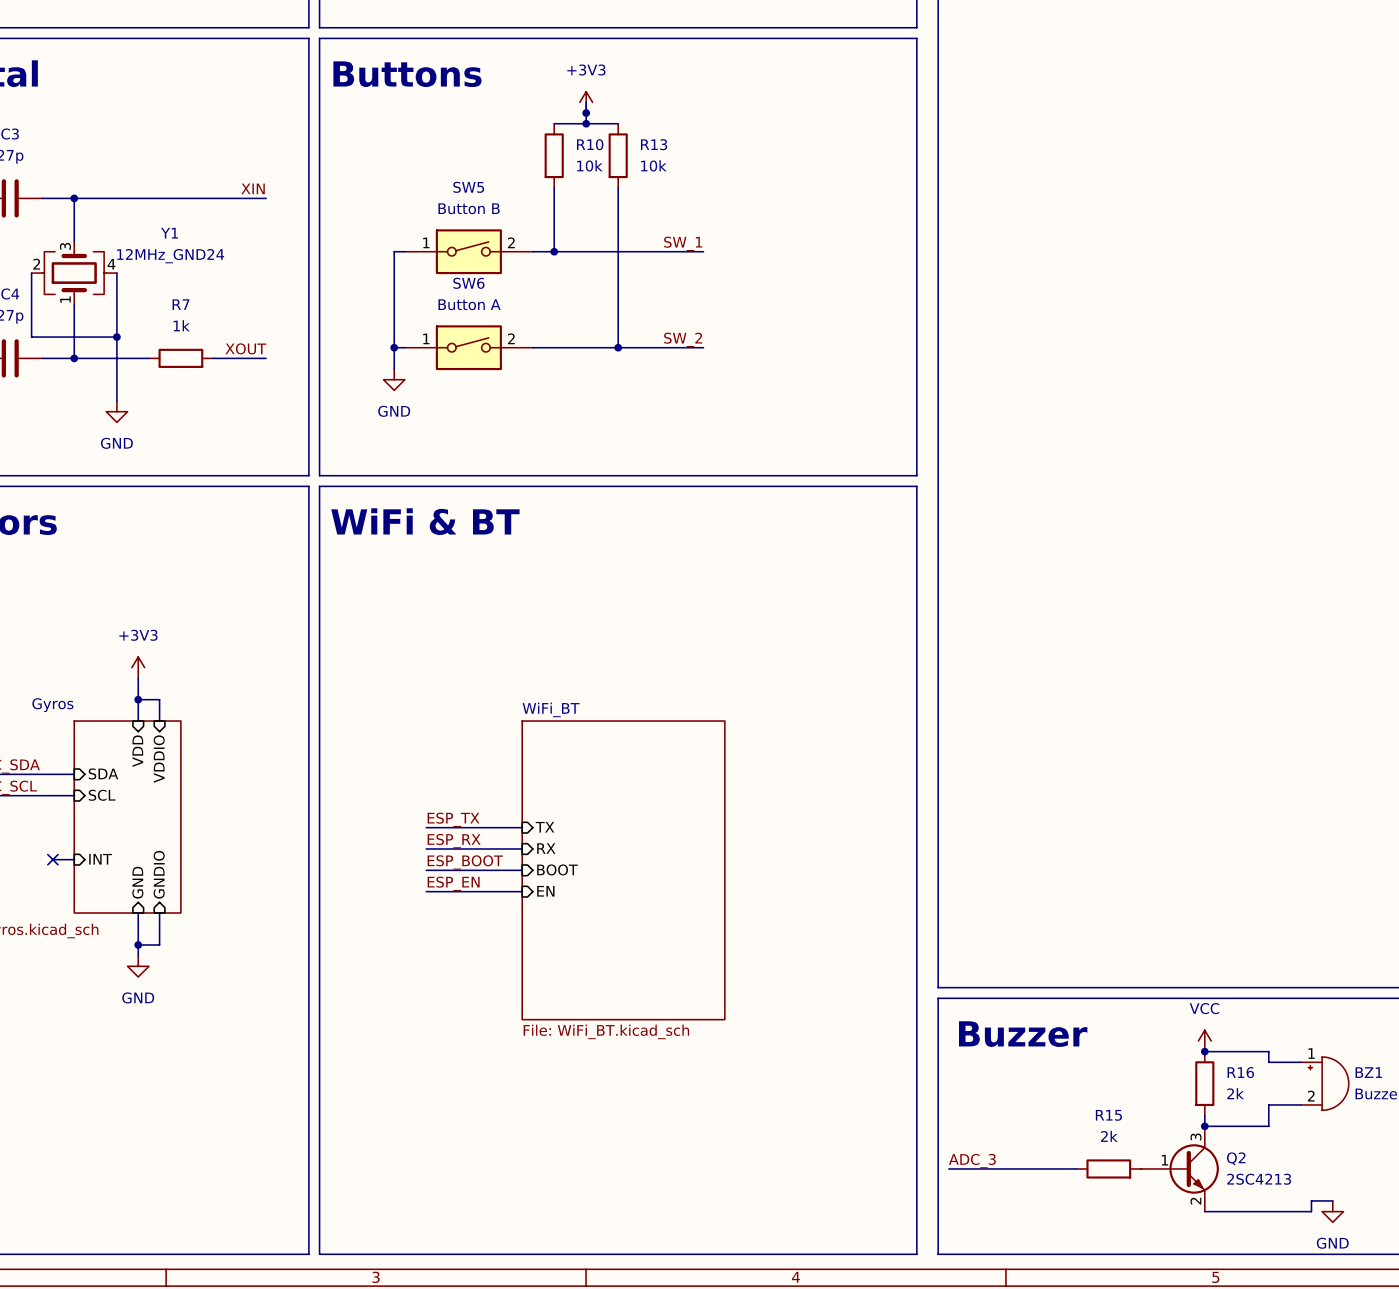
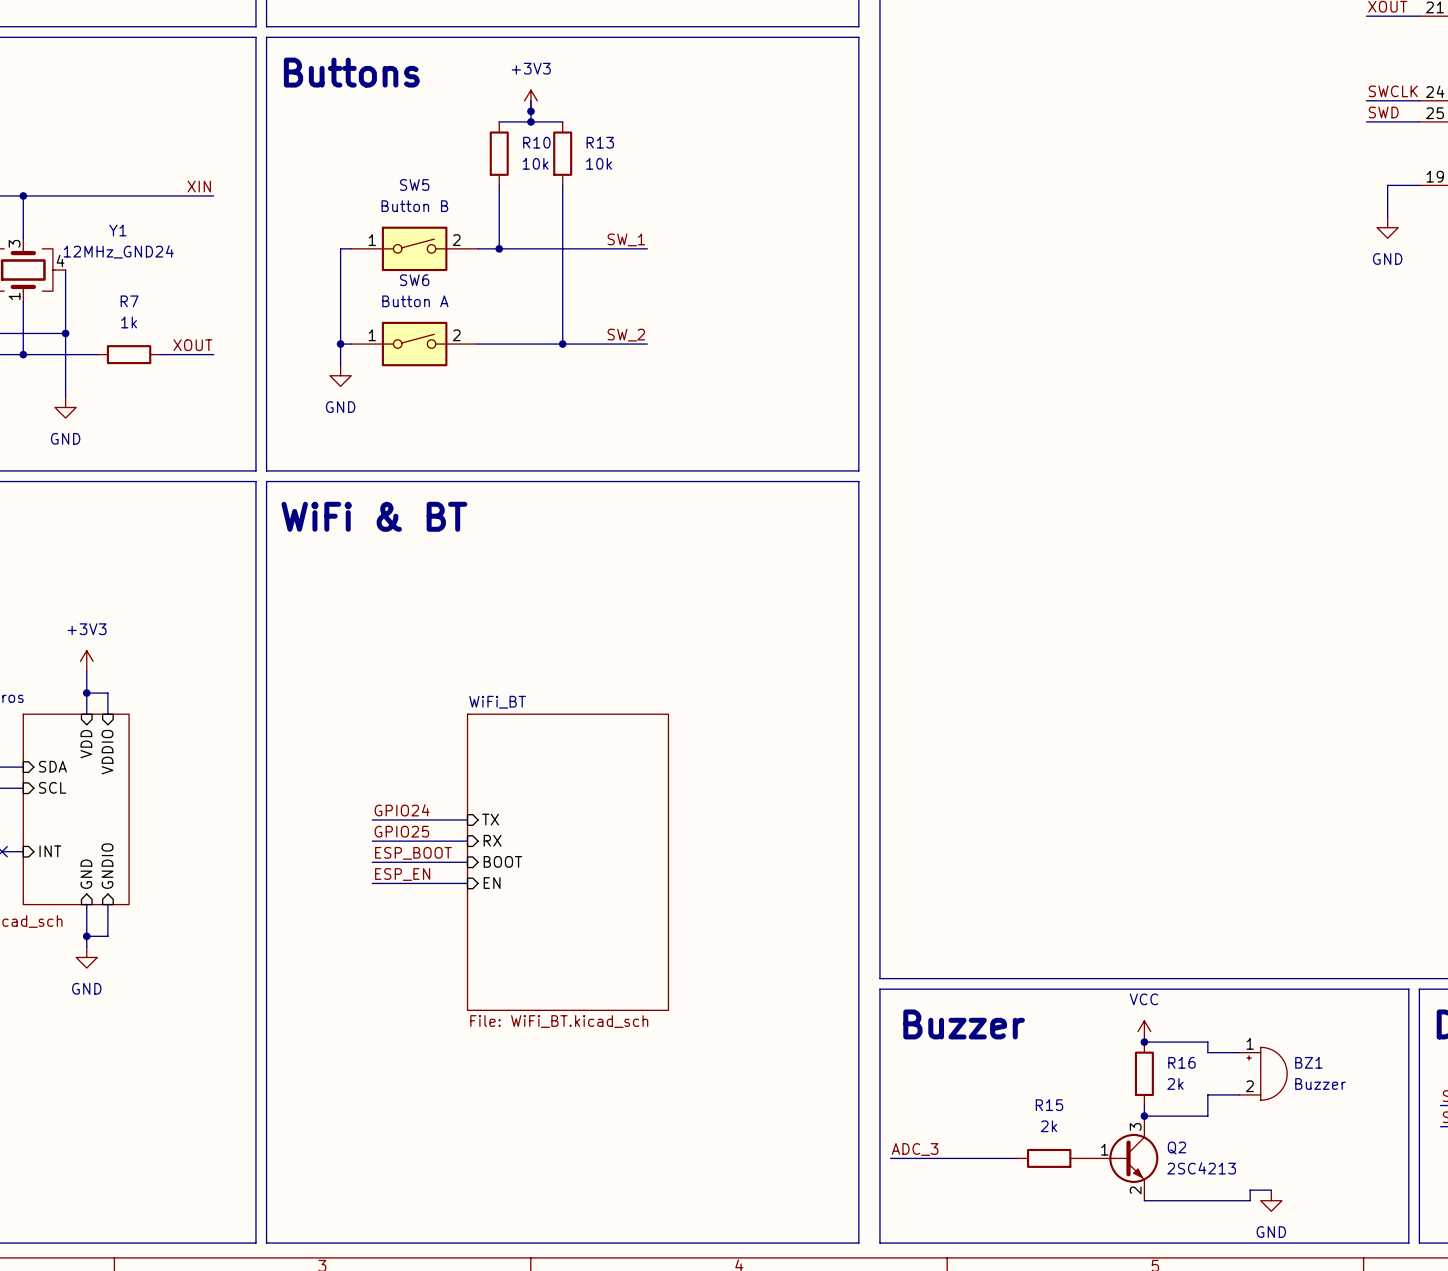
label: ESP_TX (453, 819) -> GPIO24 (402, 810)
label: ESP_RX (454, 841) -> GPIO25 (401, 831)

